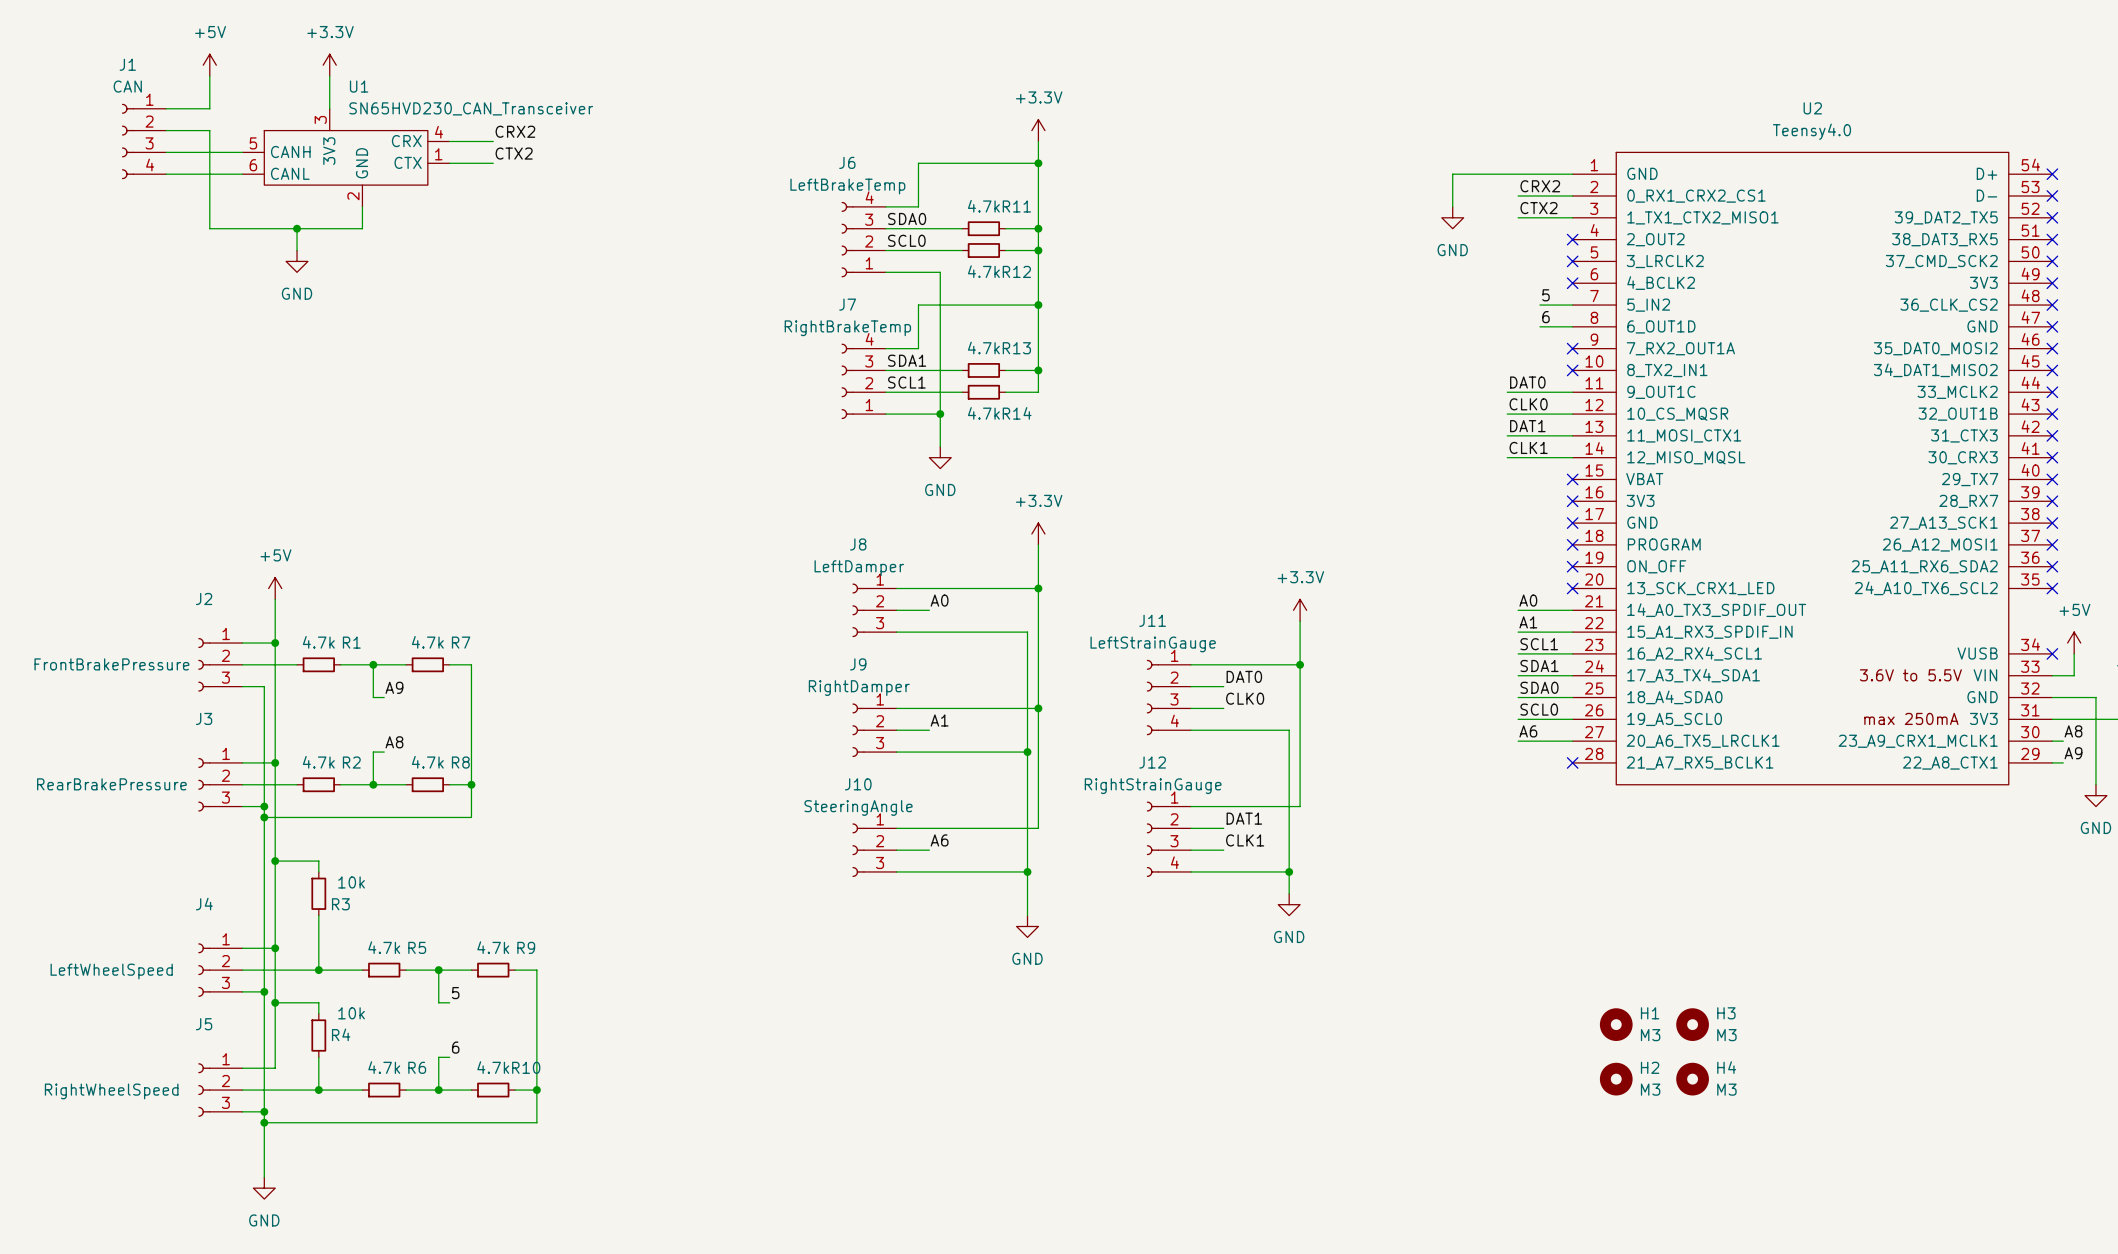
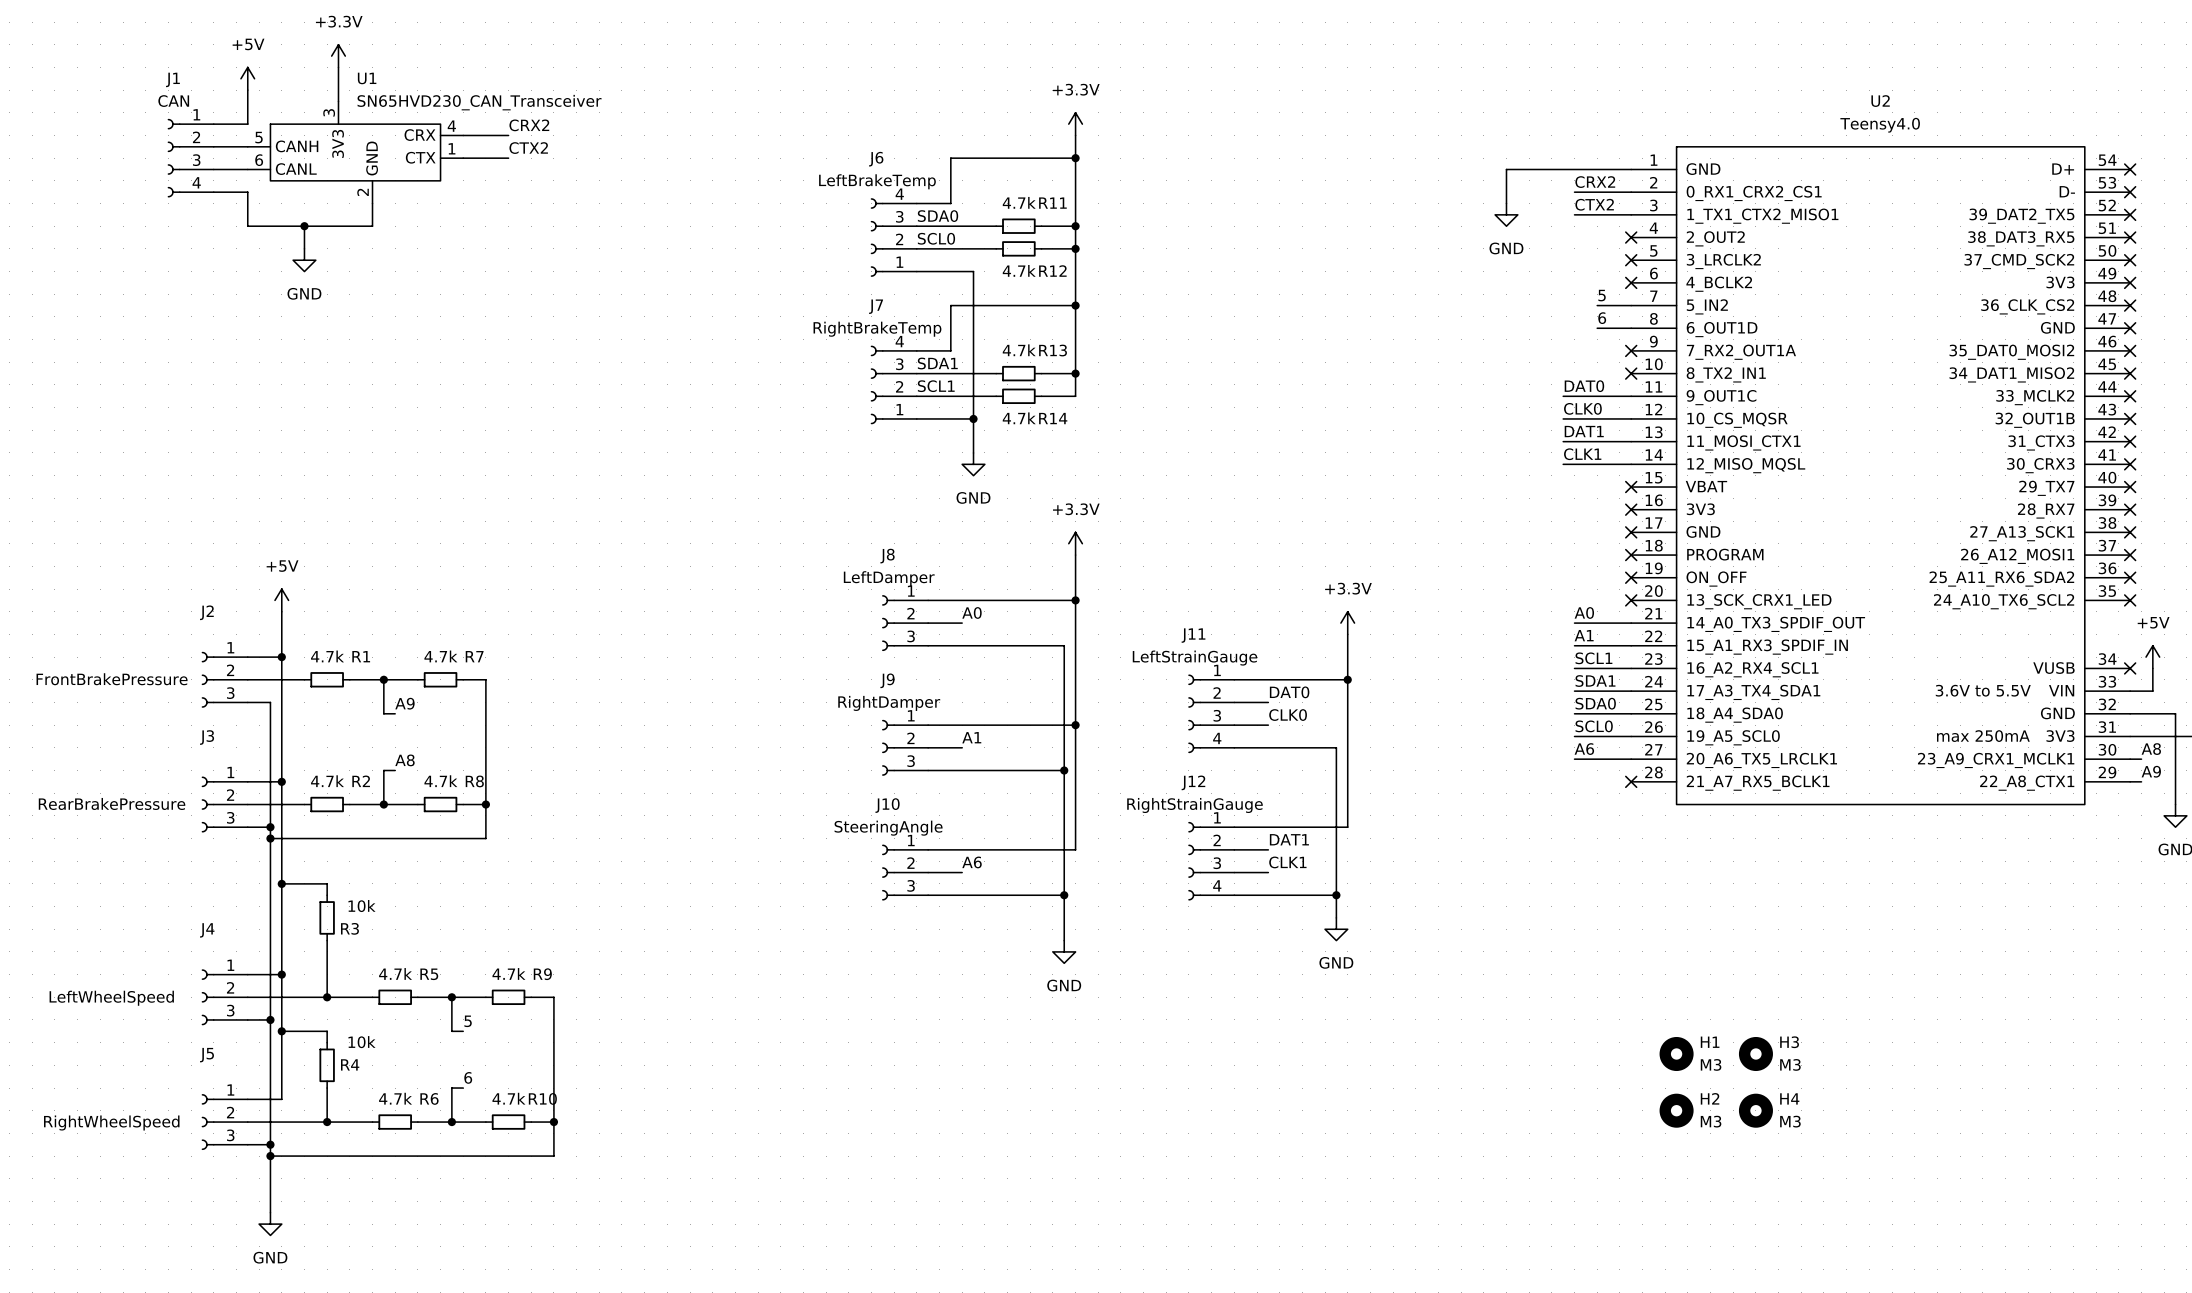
power symbol position: +5V (209, 65) -> +5V (247, 78)
wire: (209, 76) (209, 108) (166, 108) -> none
wire: none -> (247, 90) (247, 124) (213, 124)
wire: (166, 130) (209, 130) (209, 228) (242, 228) -> (213, 192) (247, 192) (247, 226)
J1 position: (144, 141) -> (190, 158)

